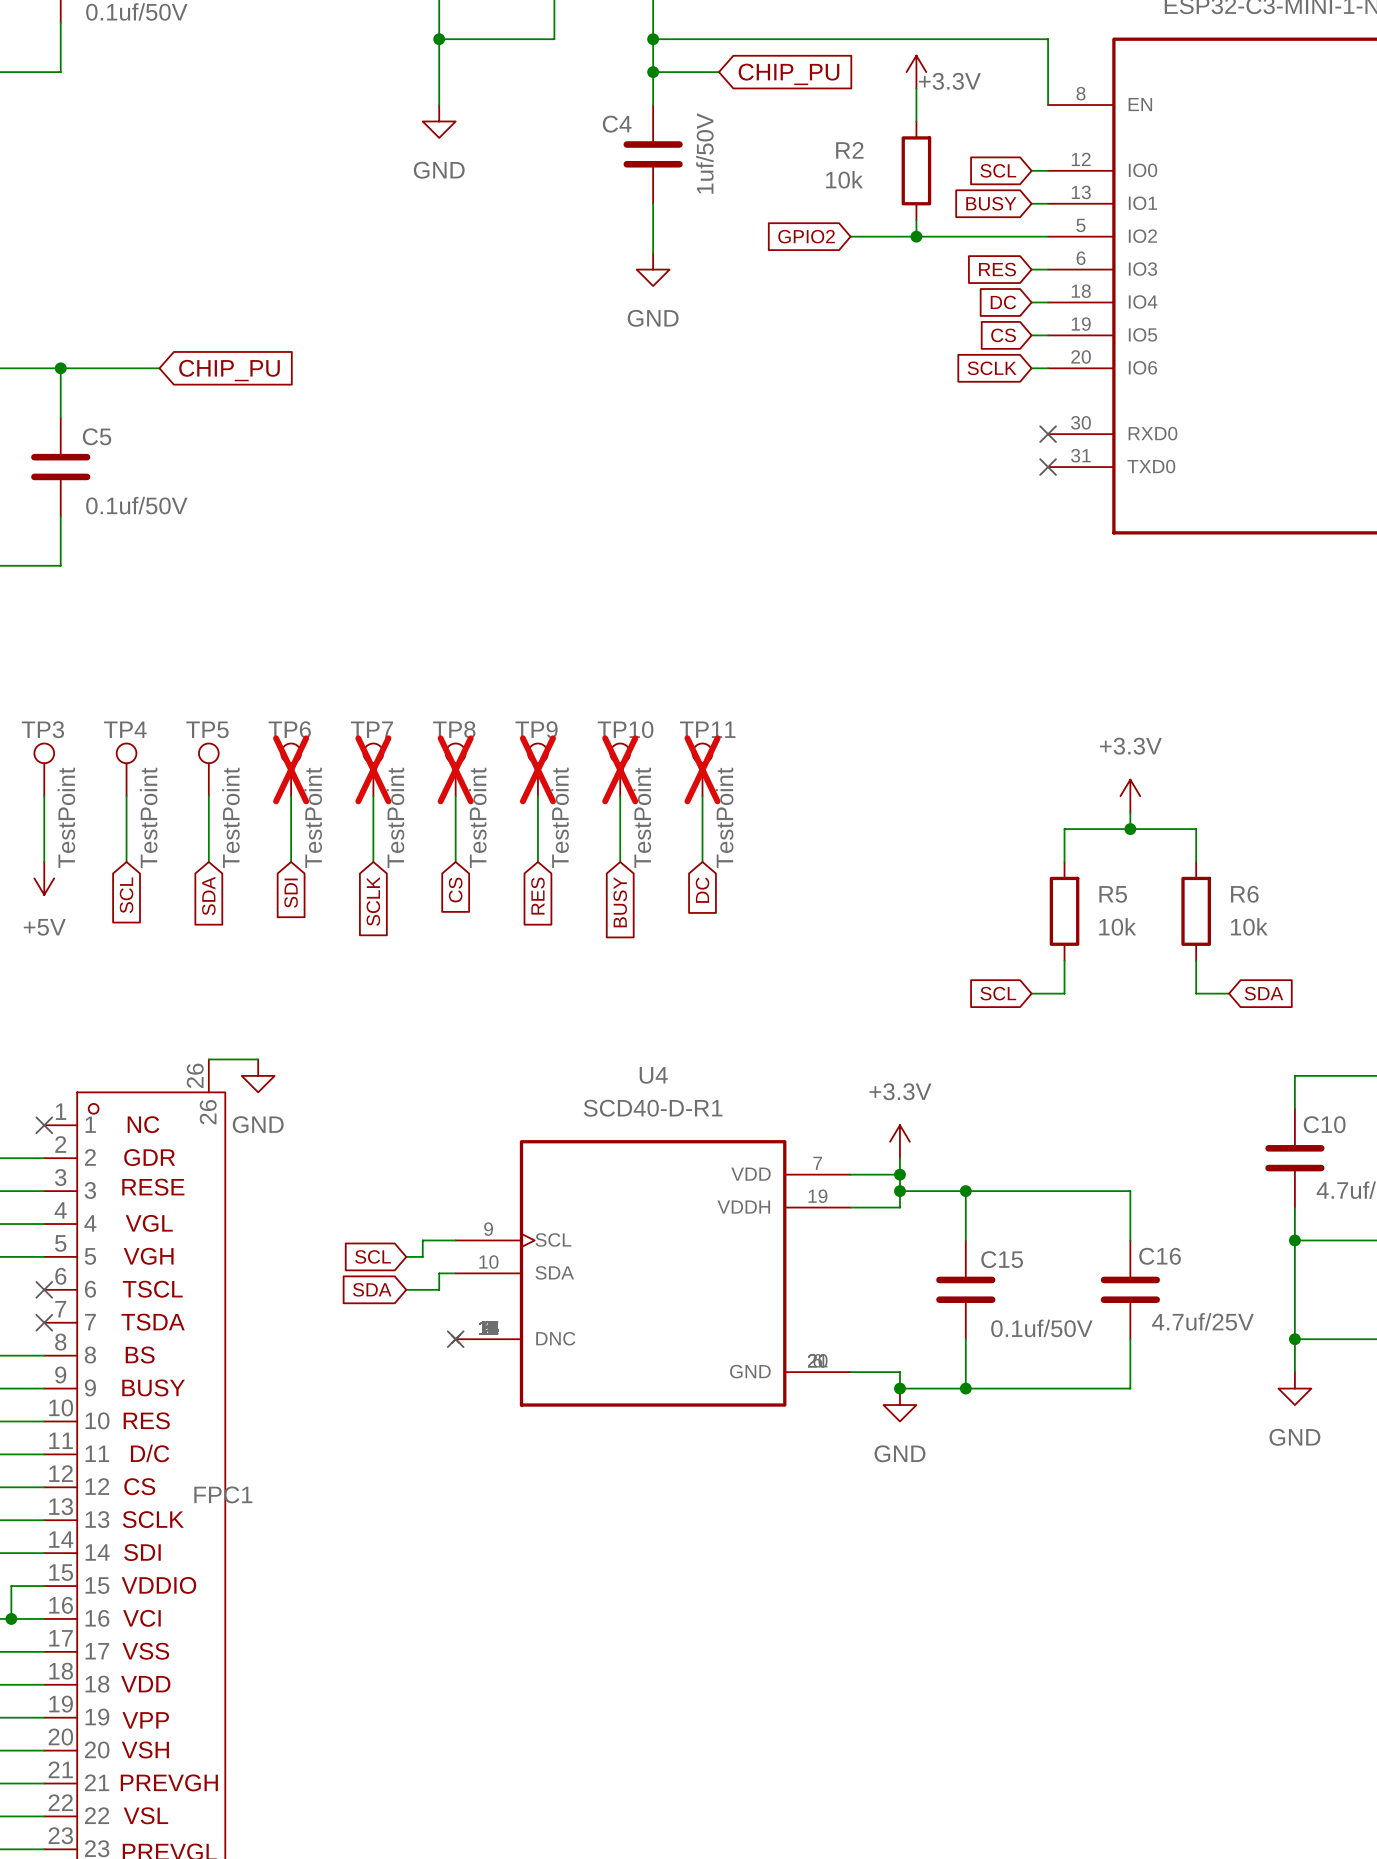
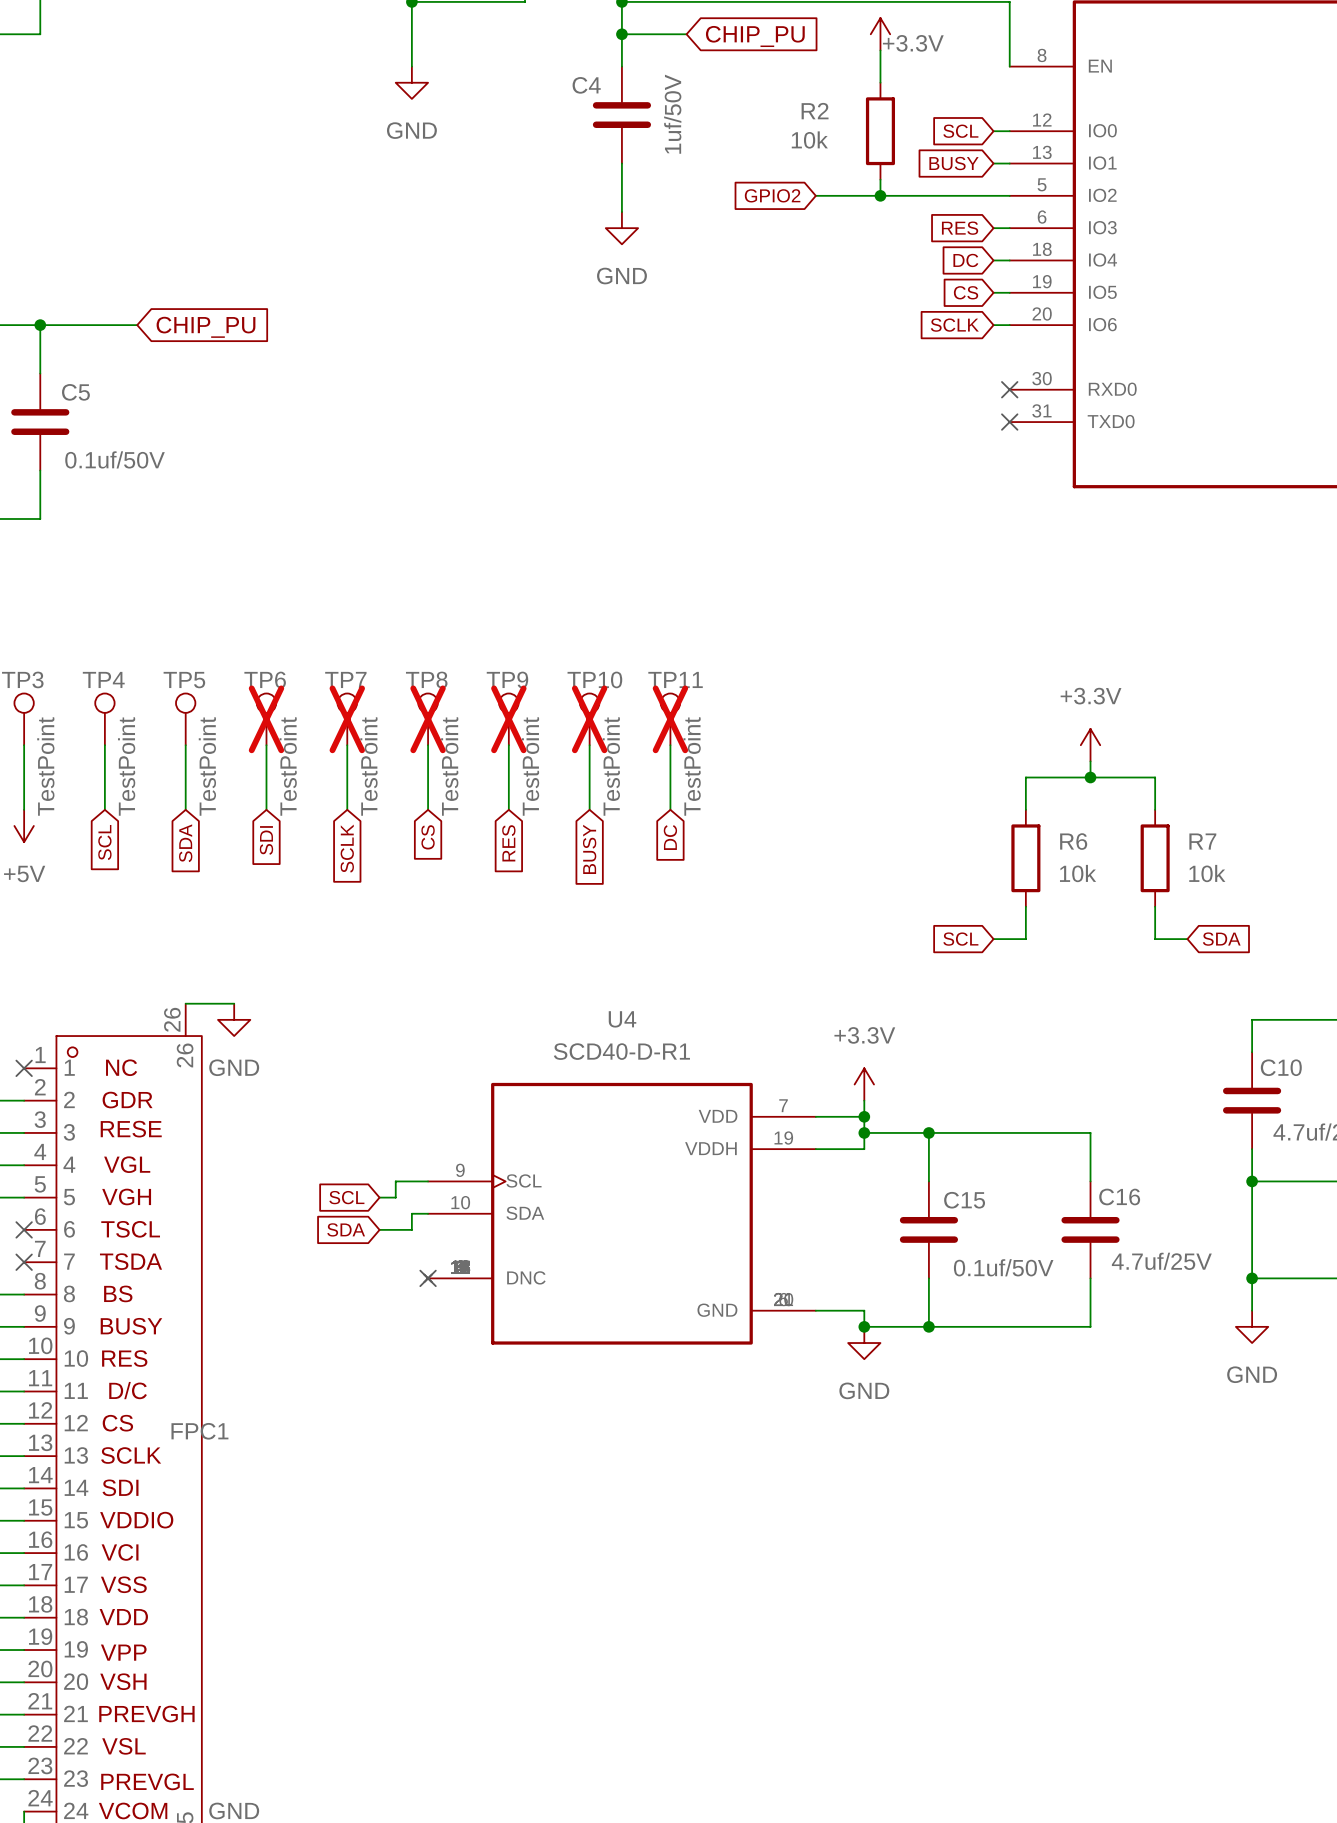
R5 name: R5 (1113, 894) -> R6 (1073, 841)
R6 name: R6 (1244, 894) -> R7 (1202, 841)

